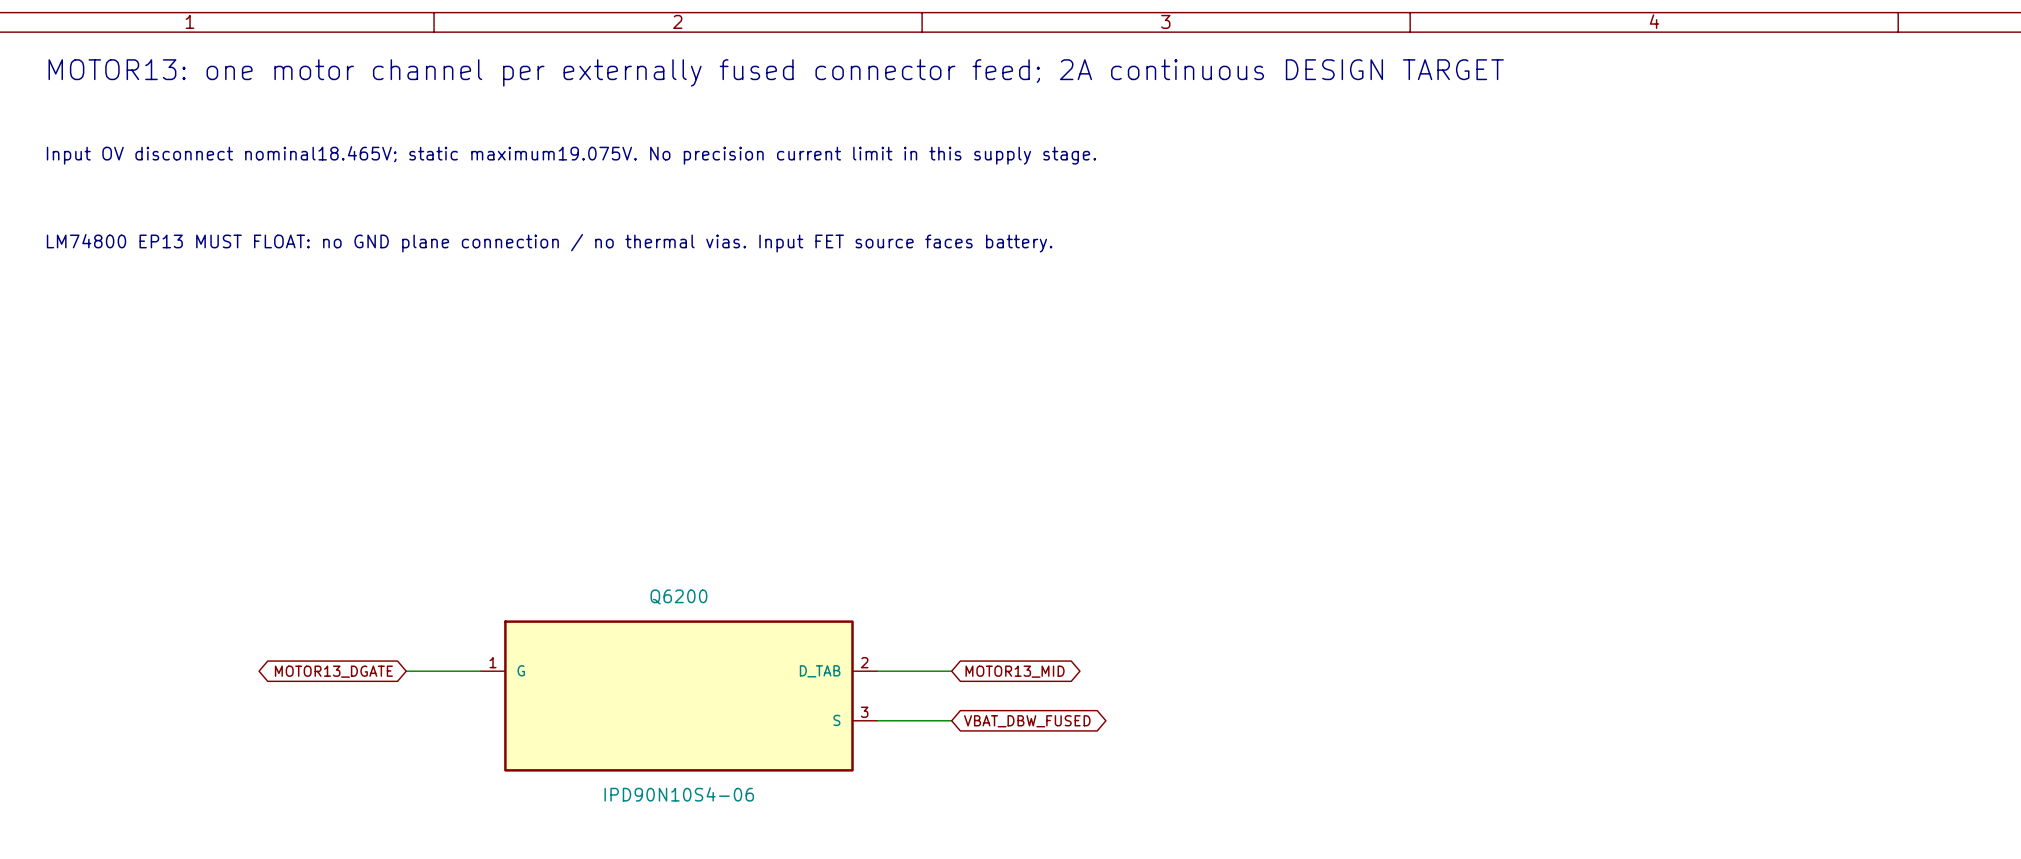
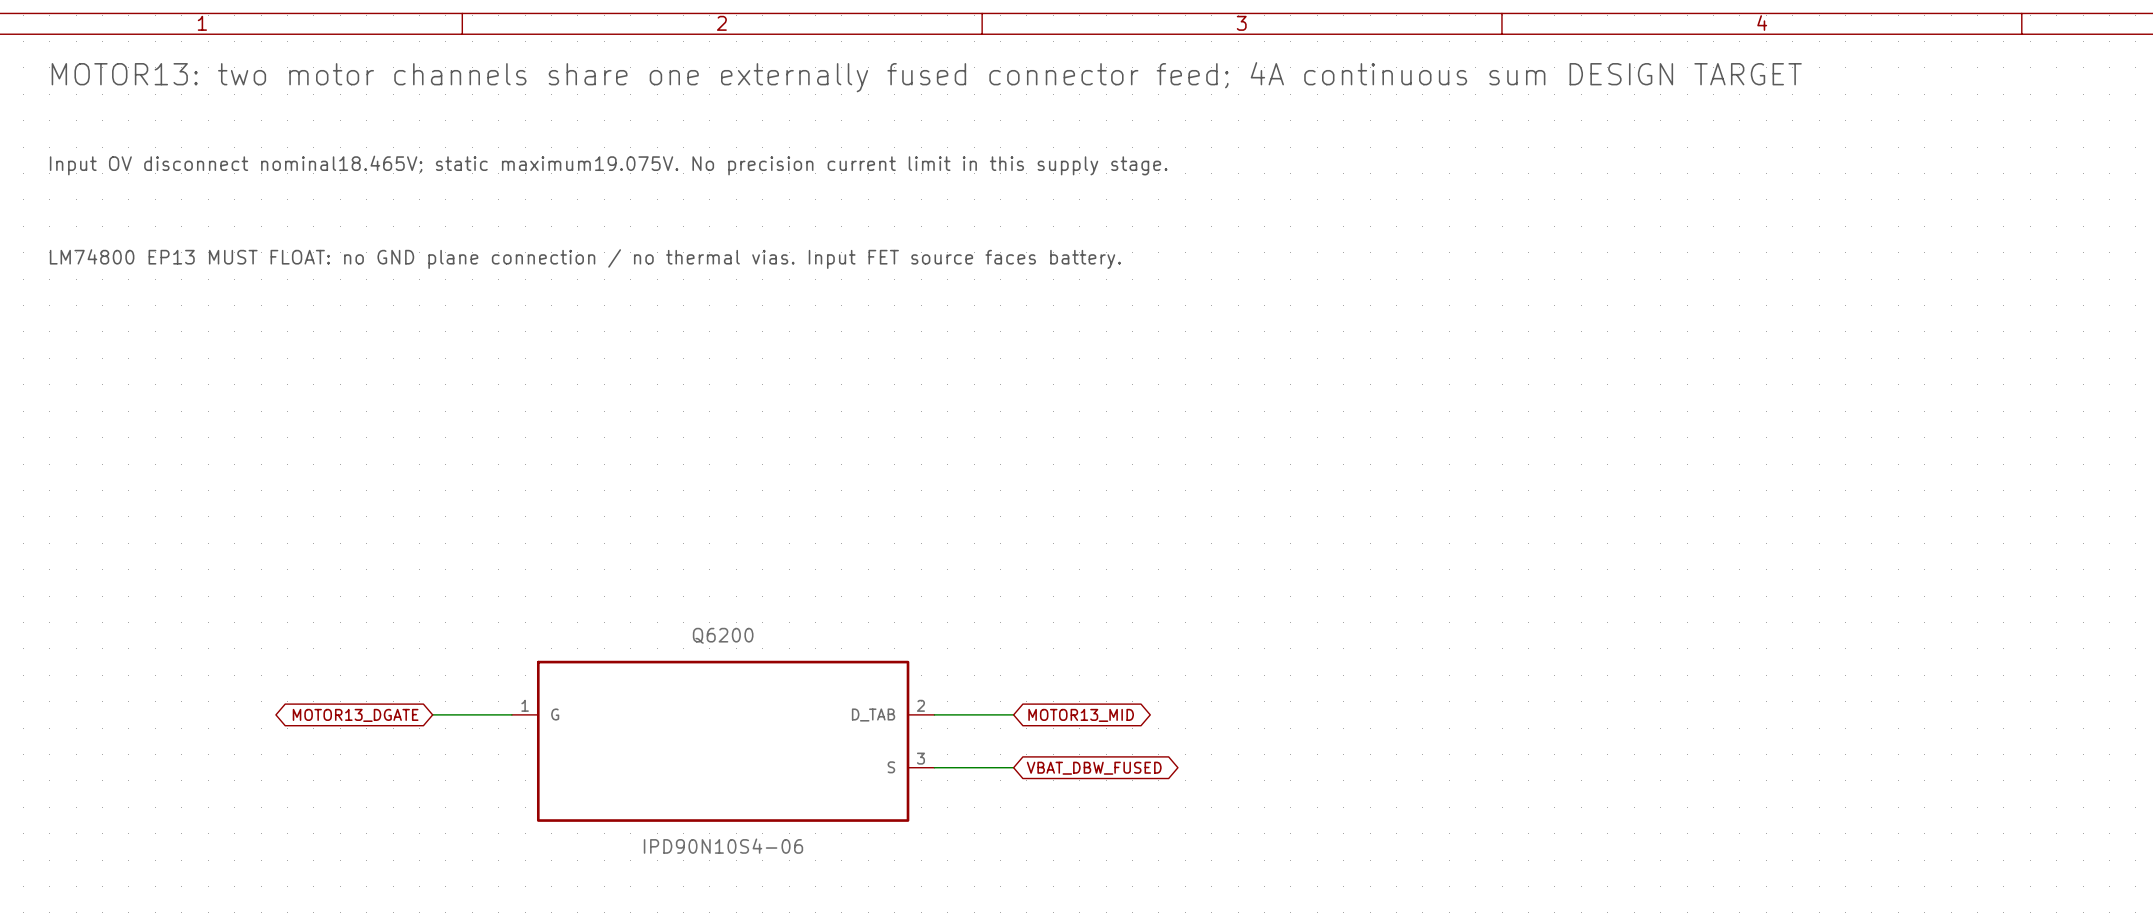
text: MOTOR13: one motor channel per externally fused connector feed; 2A continuous DESIGN TARGET (776, 72) -> MOTOR13: two motor channels share one externally fused connector feed; 4A continuous sum DESIGN TARGET (926, 77)

